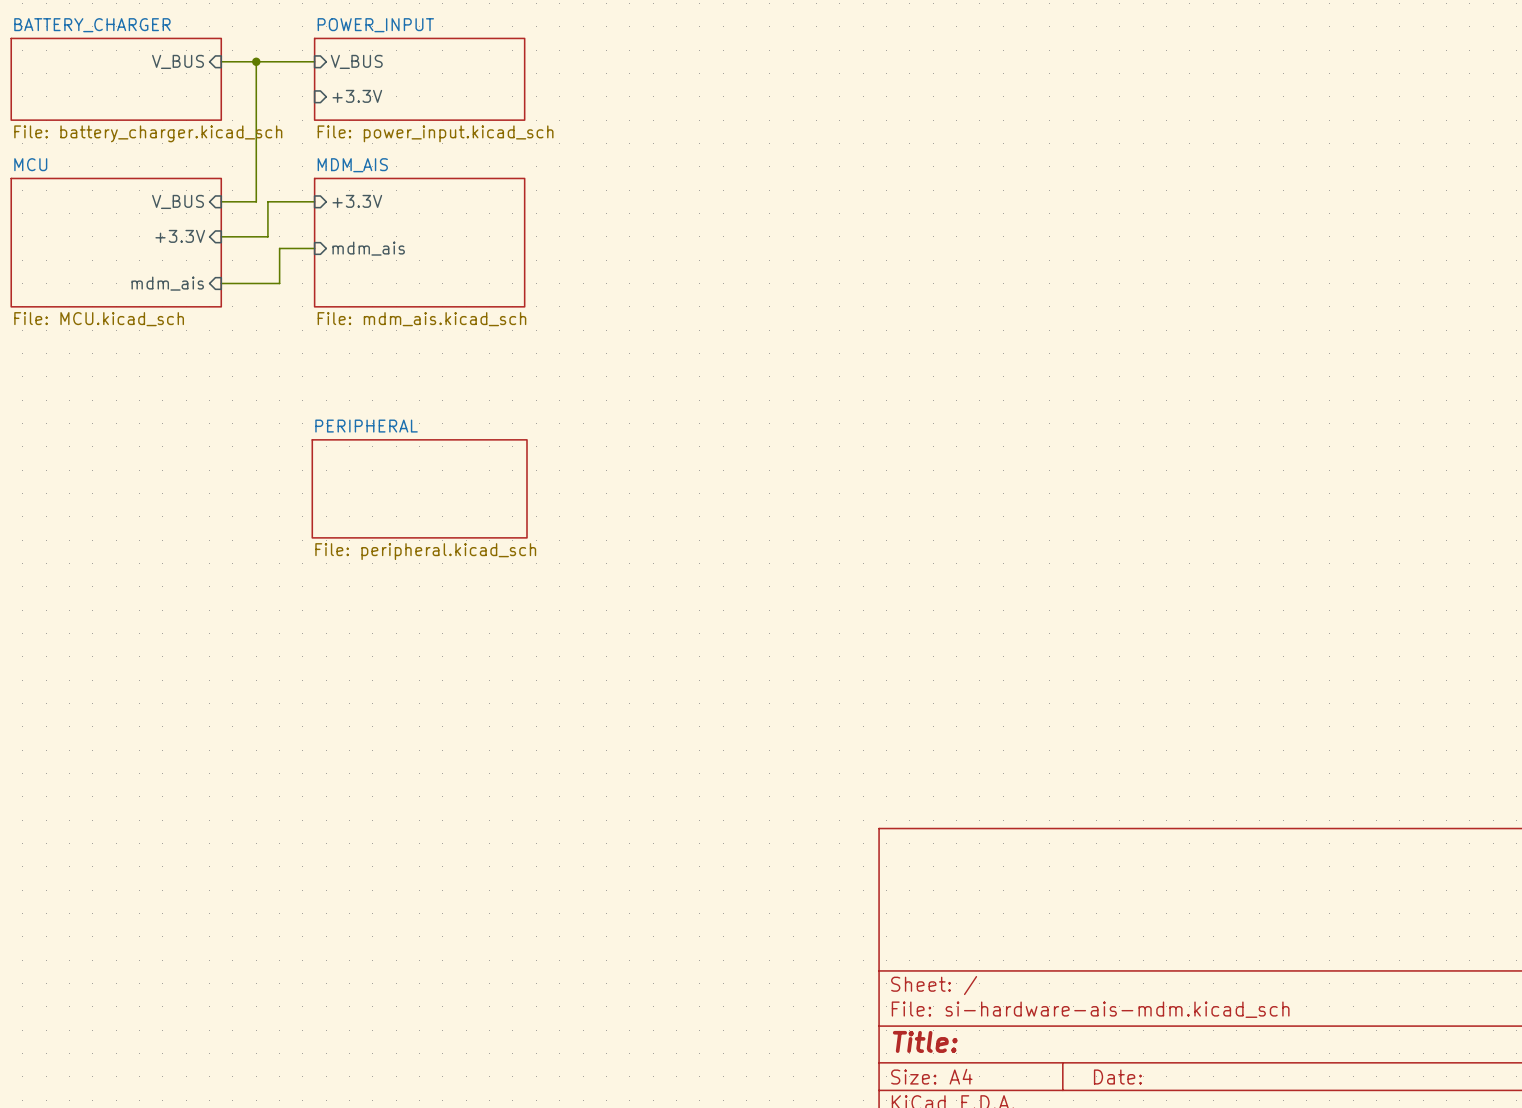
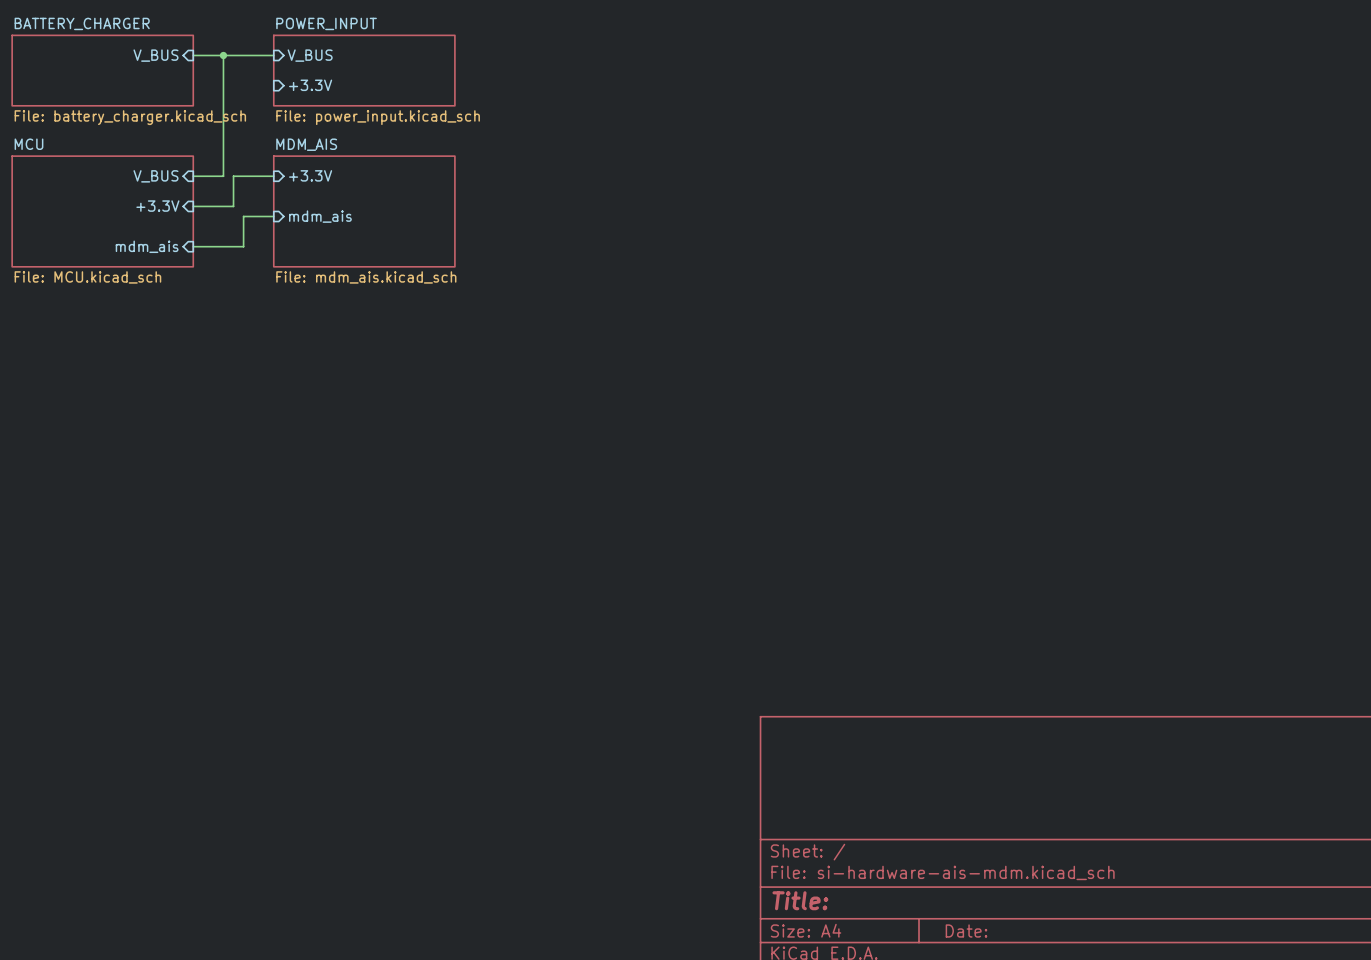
sheet PERIPHERAL: File: peripheral.kicad_sch (419, 488) -> none

